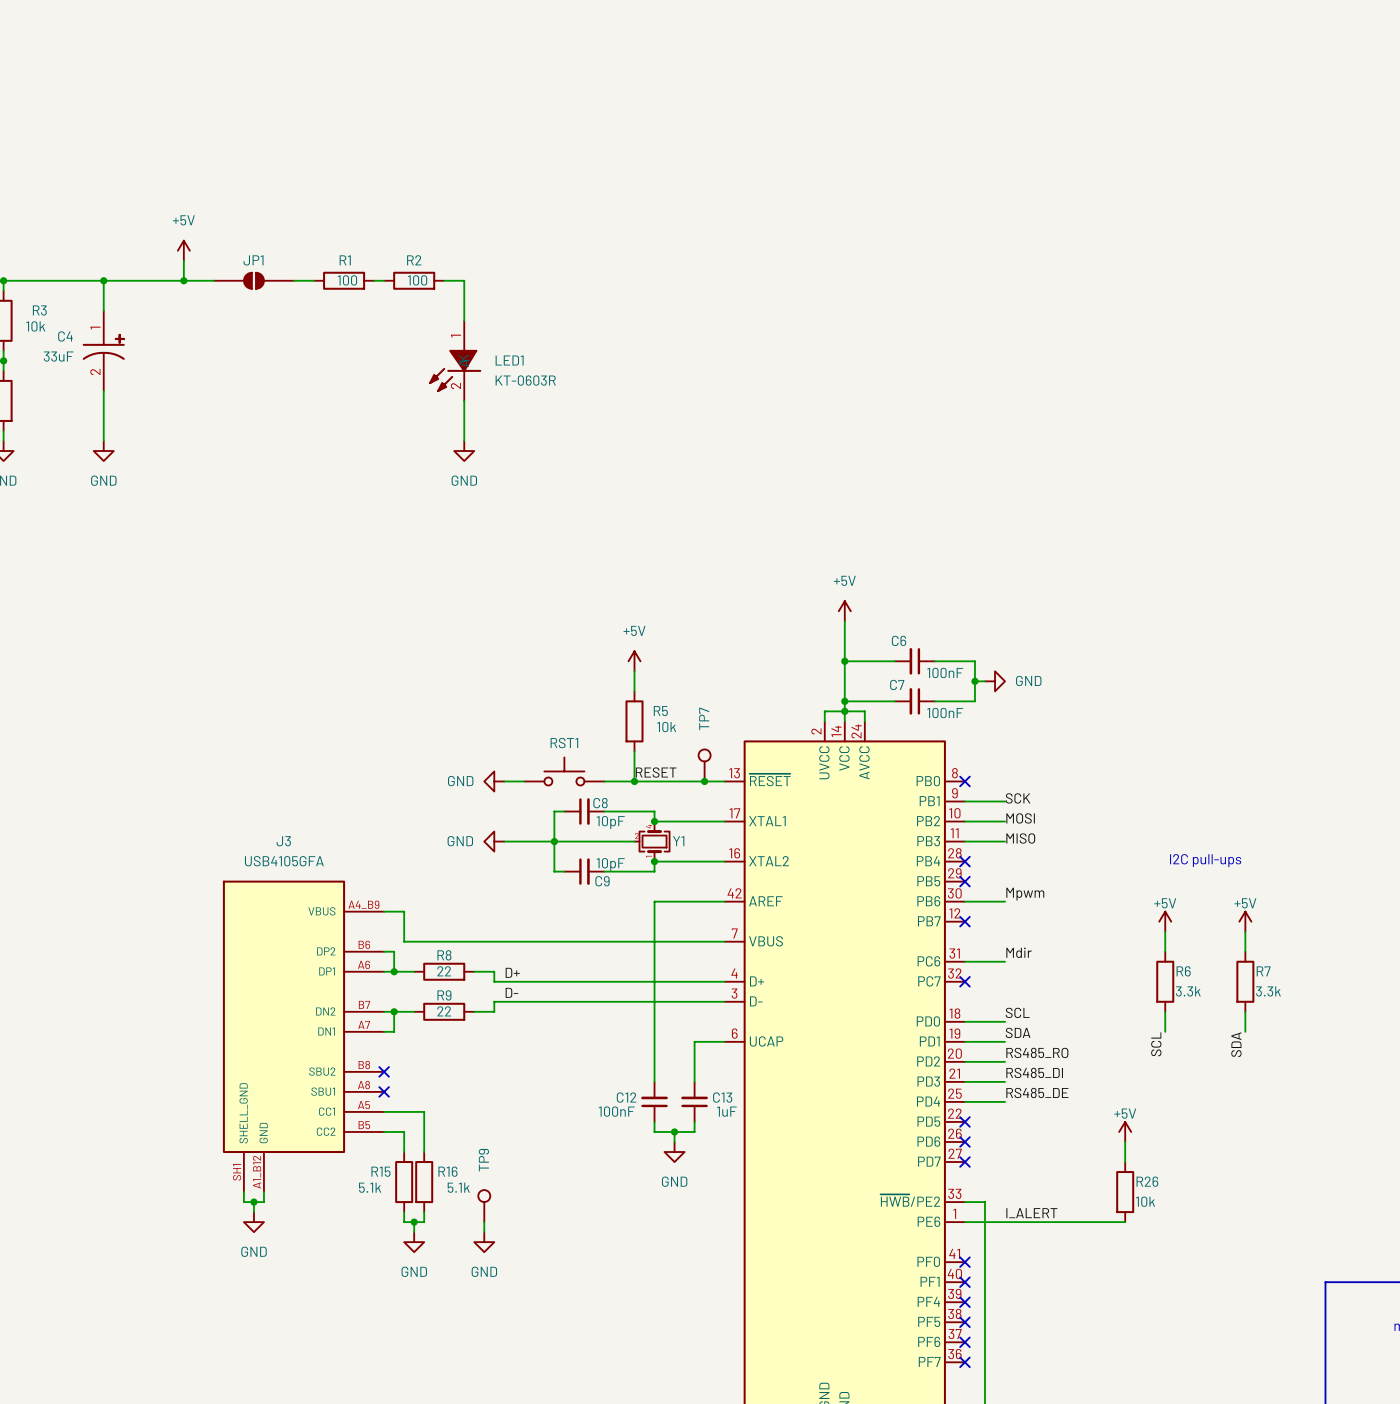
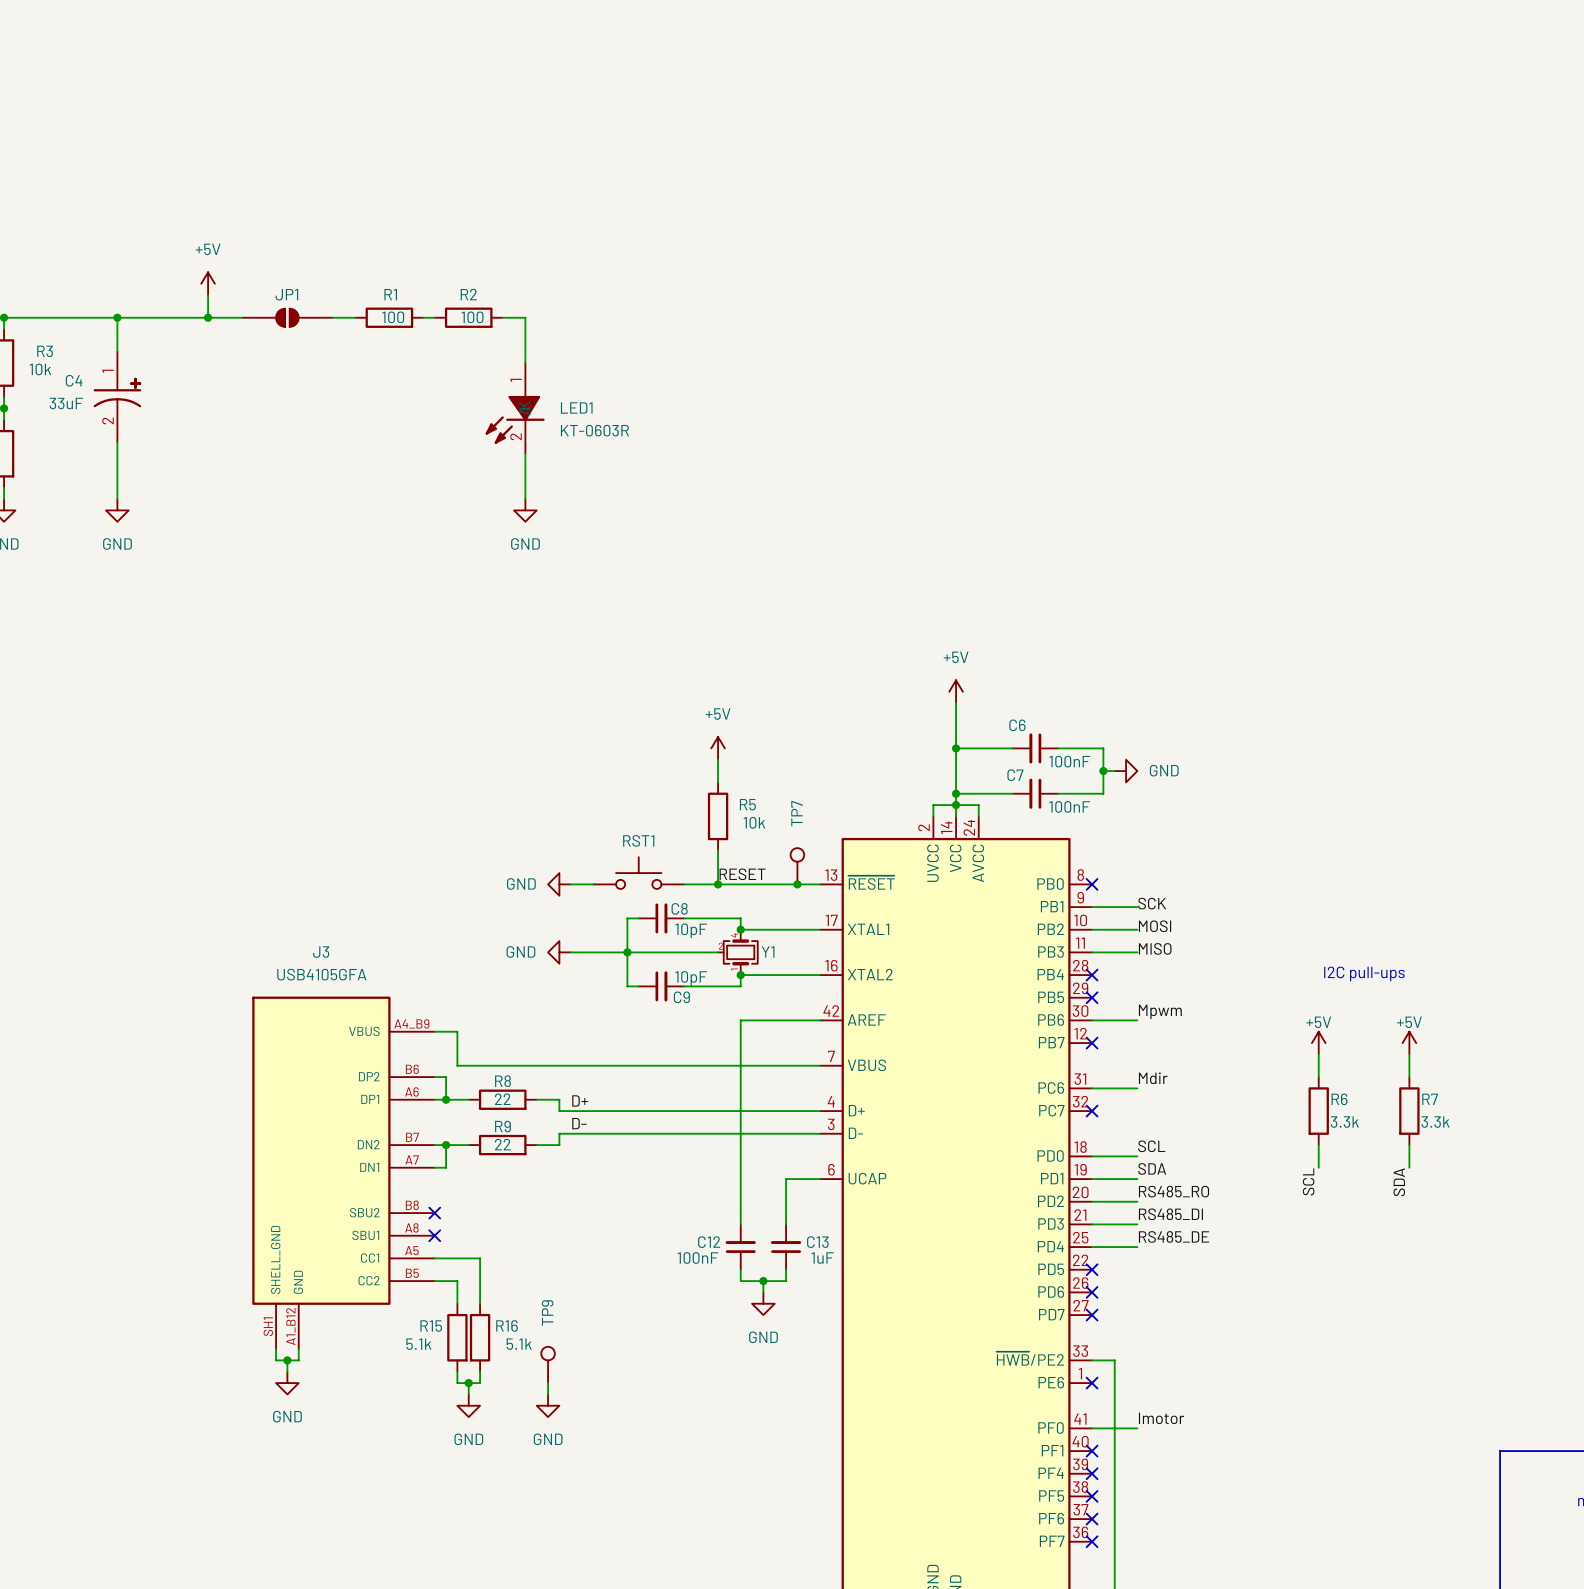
power symbol: +5V (1125, 1131) -> none
wire: (1125, 1141) (1125, 1162) -> none
R26: 10k (1125, 1192) -> none
label: I_ALERT (1031, 1213) -> none
wire: (964, 1222) (1125, 1222) -> none
label: none -> Imotor (1161, 1418)
wire: none -> (1092, 1428) (1137, 1428)
no-connect mark position: (964, 1262) -> (1092, 1383)

